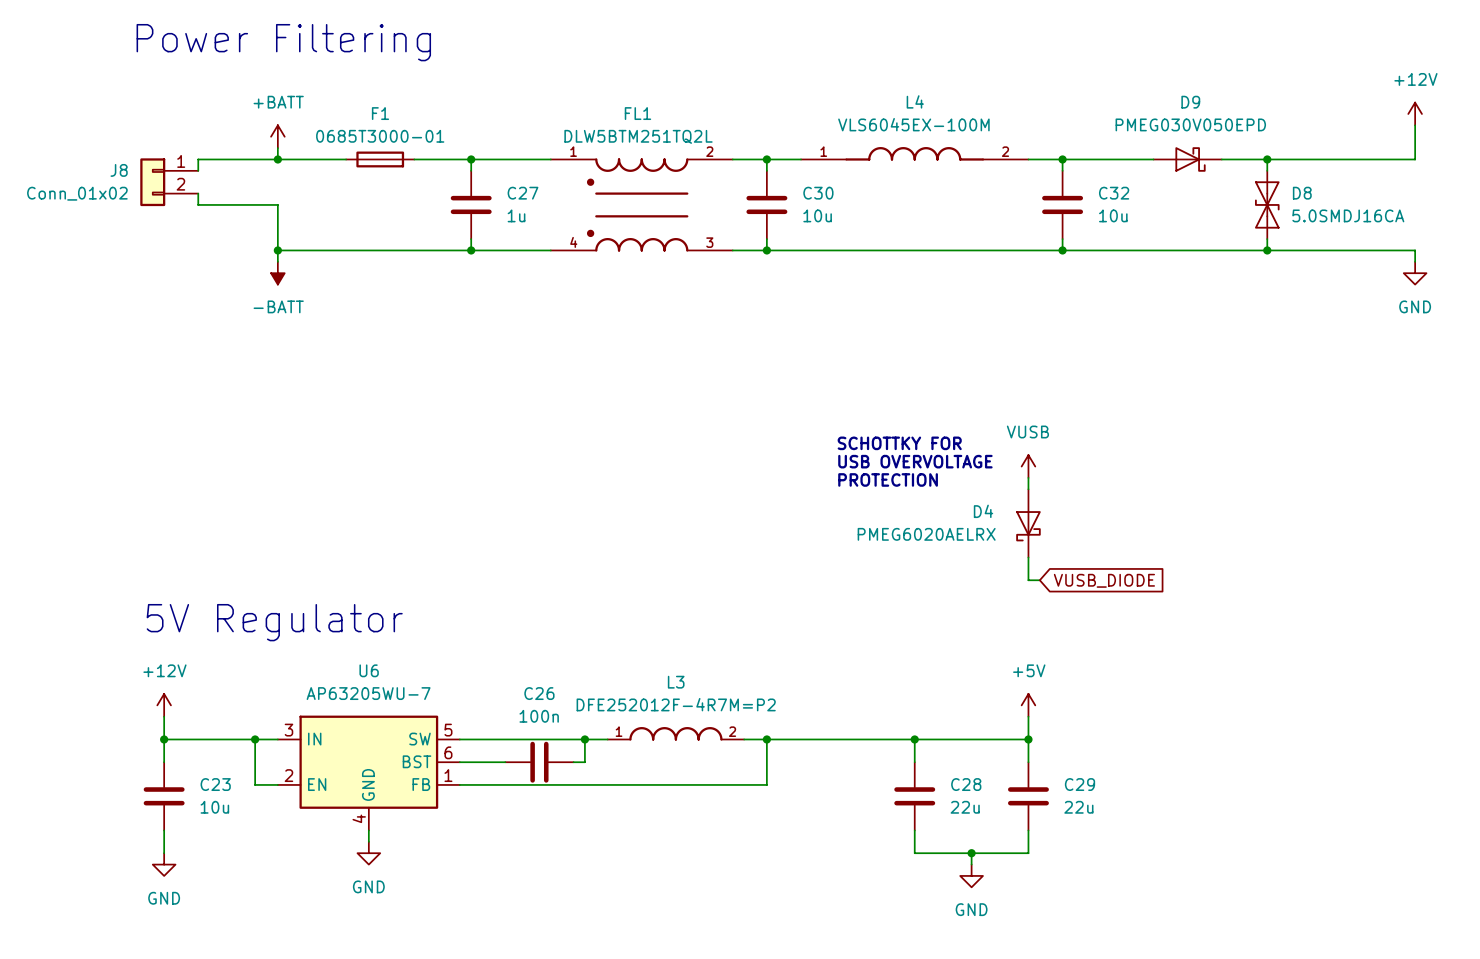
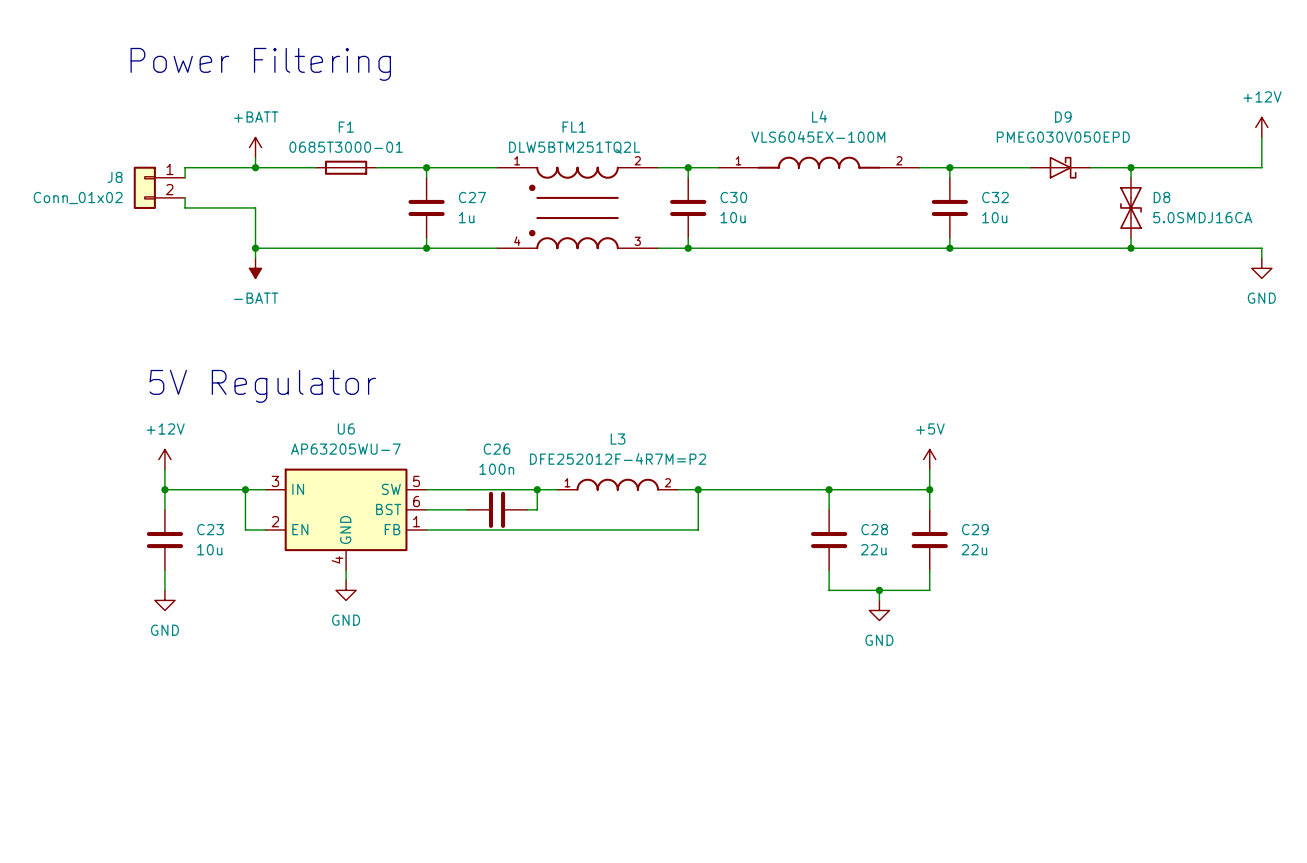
text: SCHOTTKY FOR (899, 443) -> none
text: USB OVERVOLTAGE (915, 461) -> none
power symbol: VUSB (1028, 466) -> none
wire: (1028, 477) (1028, 489) -> none
text: PROTECTION (888, 479) -> none
junction: none -> (164, 489)
junction: none -> (245, 489)
junction: none -> (537, 489)
junction: none -> (698, 489)
junction: none -> (829, 489)
D4: PMEG6020AELRX (1028, 523) -> none
junction: none -> (929, 489)
wire: (1028, 557) (1028, 580) (1039, 580) -> none
global label: VUSB_DIODE (1104, 580) -> none
text position: 5V Regulator (274, 622) -> 5V Regulator (262, 386)
power symbol: none -> GND (346, 590)
junction: none -> (879, 590)
power symbol: none -> GND (164, 600)
power symbol position: +12V (164, 705) -> +12V (164, 459)
power symbol position: +5V (1028, 705) -> +5V (929, 459)
wire: (164, 716) (164, 762) -> (164, 469) (164, 509)
wire: (1028, 716) (1028, 762) -> (929, 469) (929, 509)
L3 position: (675, 733) -> (617, 484)
wire: (164, 739) (277, 739) -> (164, 489) (265, 489)
junction: (164, 739) -> none
wire: (255, 739) (255, 784) (277, 784) -> (245, 489) (245, 529) (265, 529)
junction: (255, 739) -> none
wire: (459, 739) (607, 739) -> (426, 489) (557, 489)
wire: (584, 739) (584, 762) (573, 762) -> (537, 489) (537, 509) (527, 509)
junction: (584, 739) -> none
wire: (744, 739) (1028, 739) -> (678, 489) (929, 489)
wire: (766, 739) (766, 784) (459, 784) -> (698, 489) (698, 529) (426, 529)
junction: (766, 739) -> none
wire: (914, 739) (914, 762) -> (829, 489) (829, 509)
junction: (914, 739) -> none
junction: (1028, 739) -> none
wire: (459, 762) (505, 762) -> (426, 509) (466, 509)
C26 position: (539, 762) -> (497, 509)
U6 position: (368, 773) -> (346, 519)
C23 position: (164, 796) -> (164, 540)
C28 position: (914, 796) -> (829, 540)
C29 position: (1028, 796) -> (929, 540)
wire: (164, 830) (164, 853) -> (164, 570) (164, 590)
wire: (368, 830) (368, 841) -> (346, 570) (346, 580)
wire: (914, 830) (914, 853) (1028, 853) (1028, 830) -> (829, 570) (829, 590) (929, 590) (929, 570)
power symbol: GND (368, 853) -> none
wire: (971, 853) (971, 864) -> (879, 590) (879, 600)
junction: (971, 853) -> none
power symbol: GND (164, 864) -> none
power symbol position: GND (971, 875) -> GND (879, 610)

